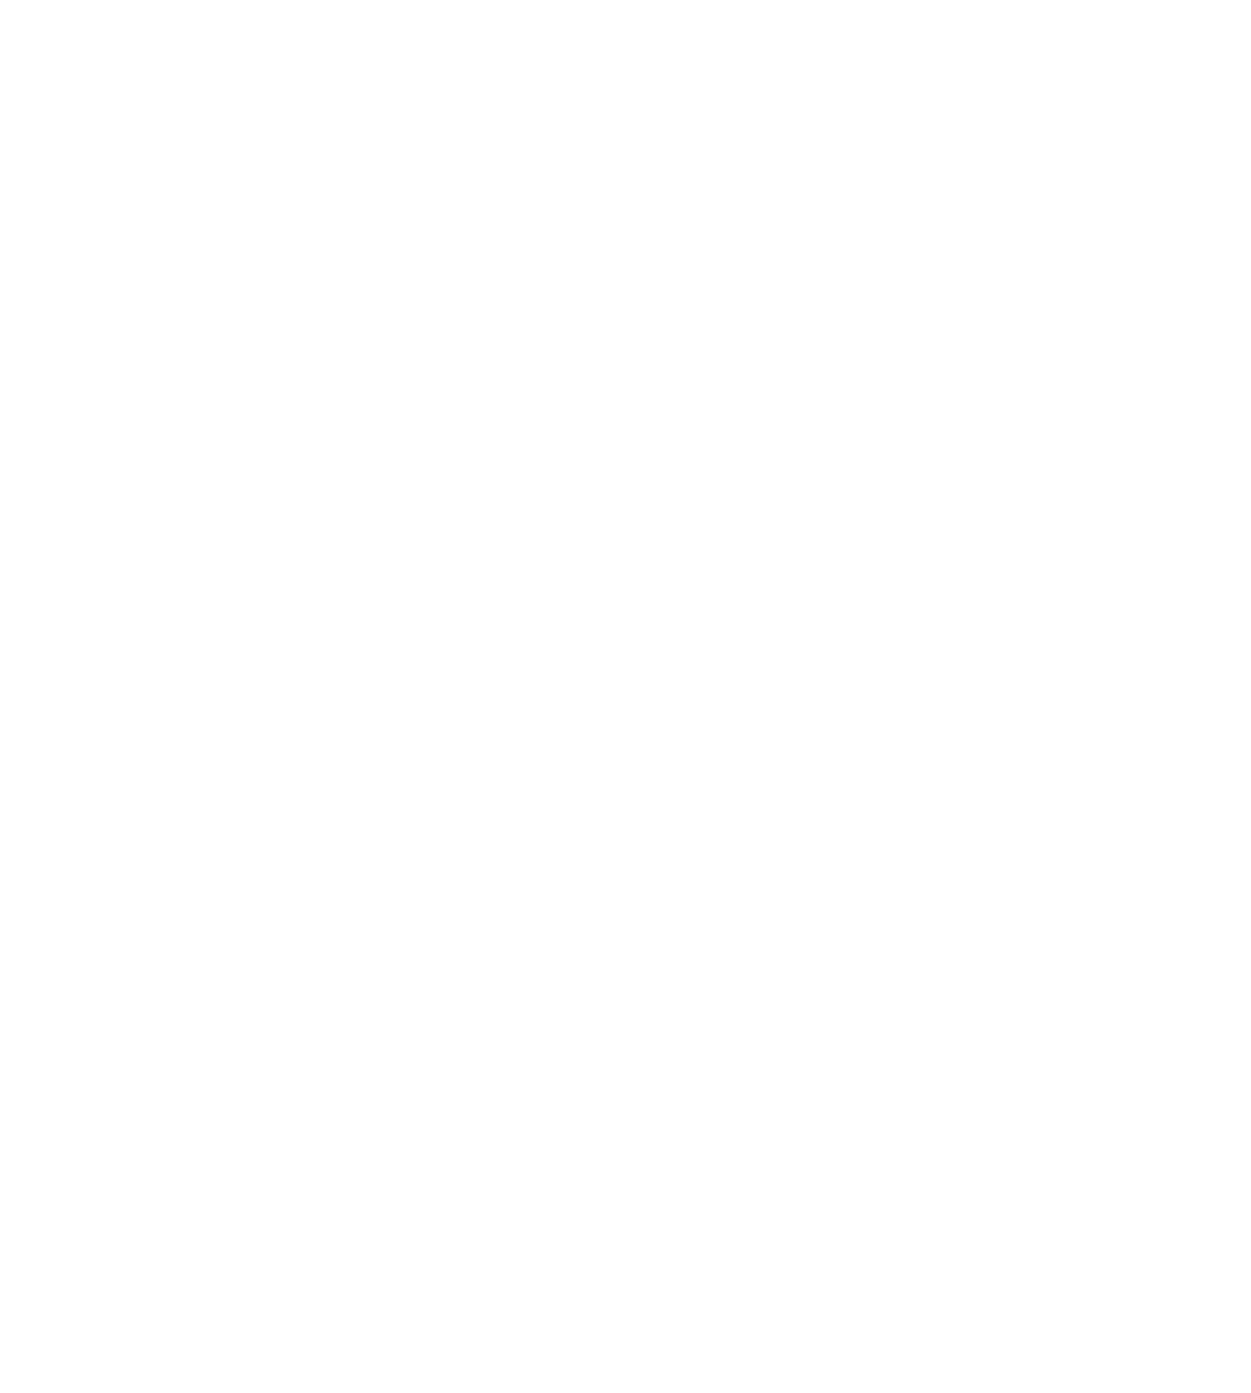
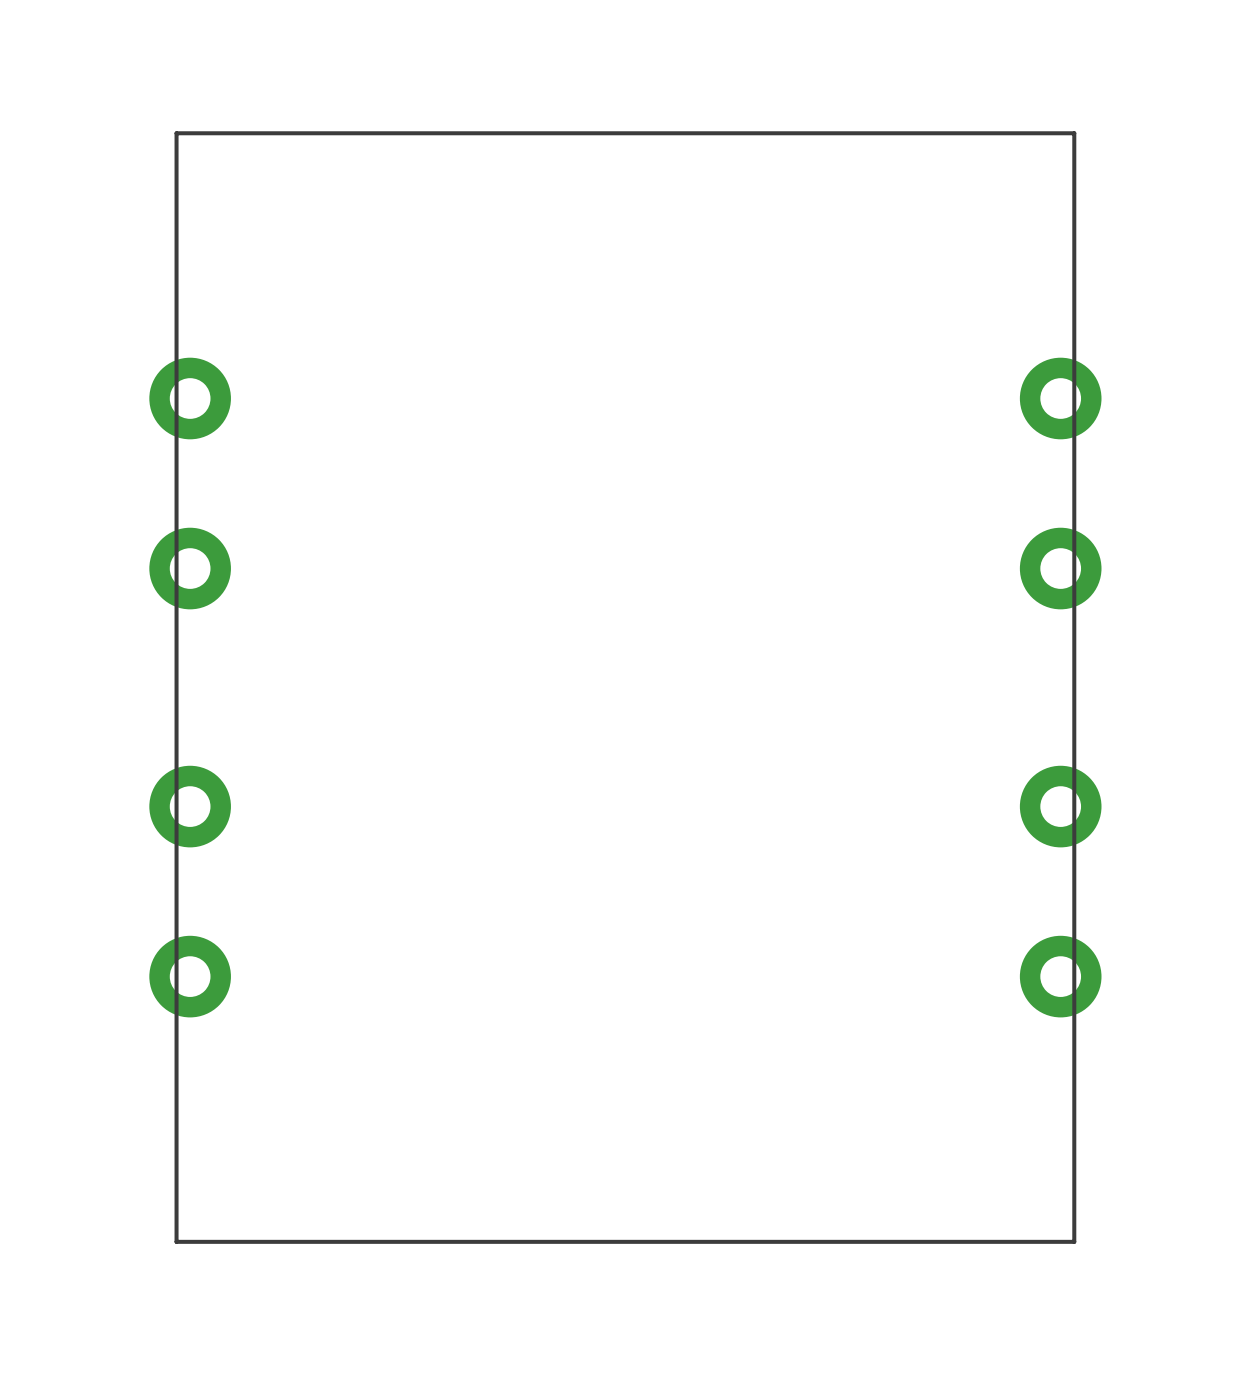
part: none -> (625, 687)

